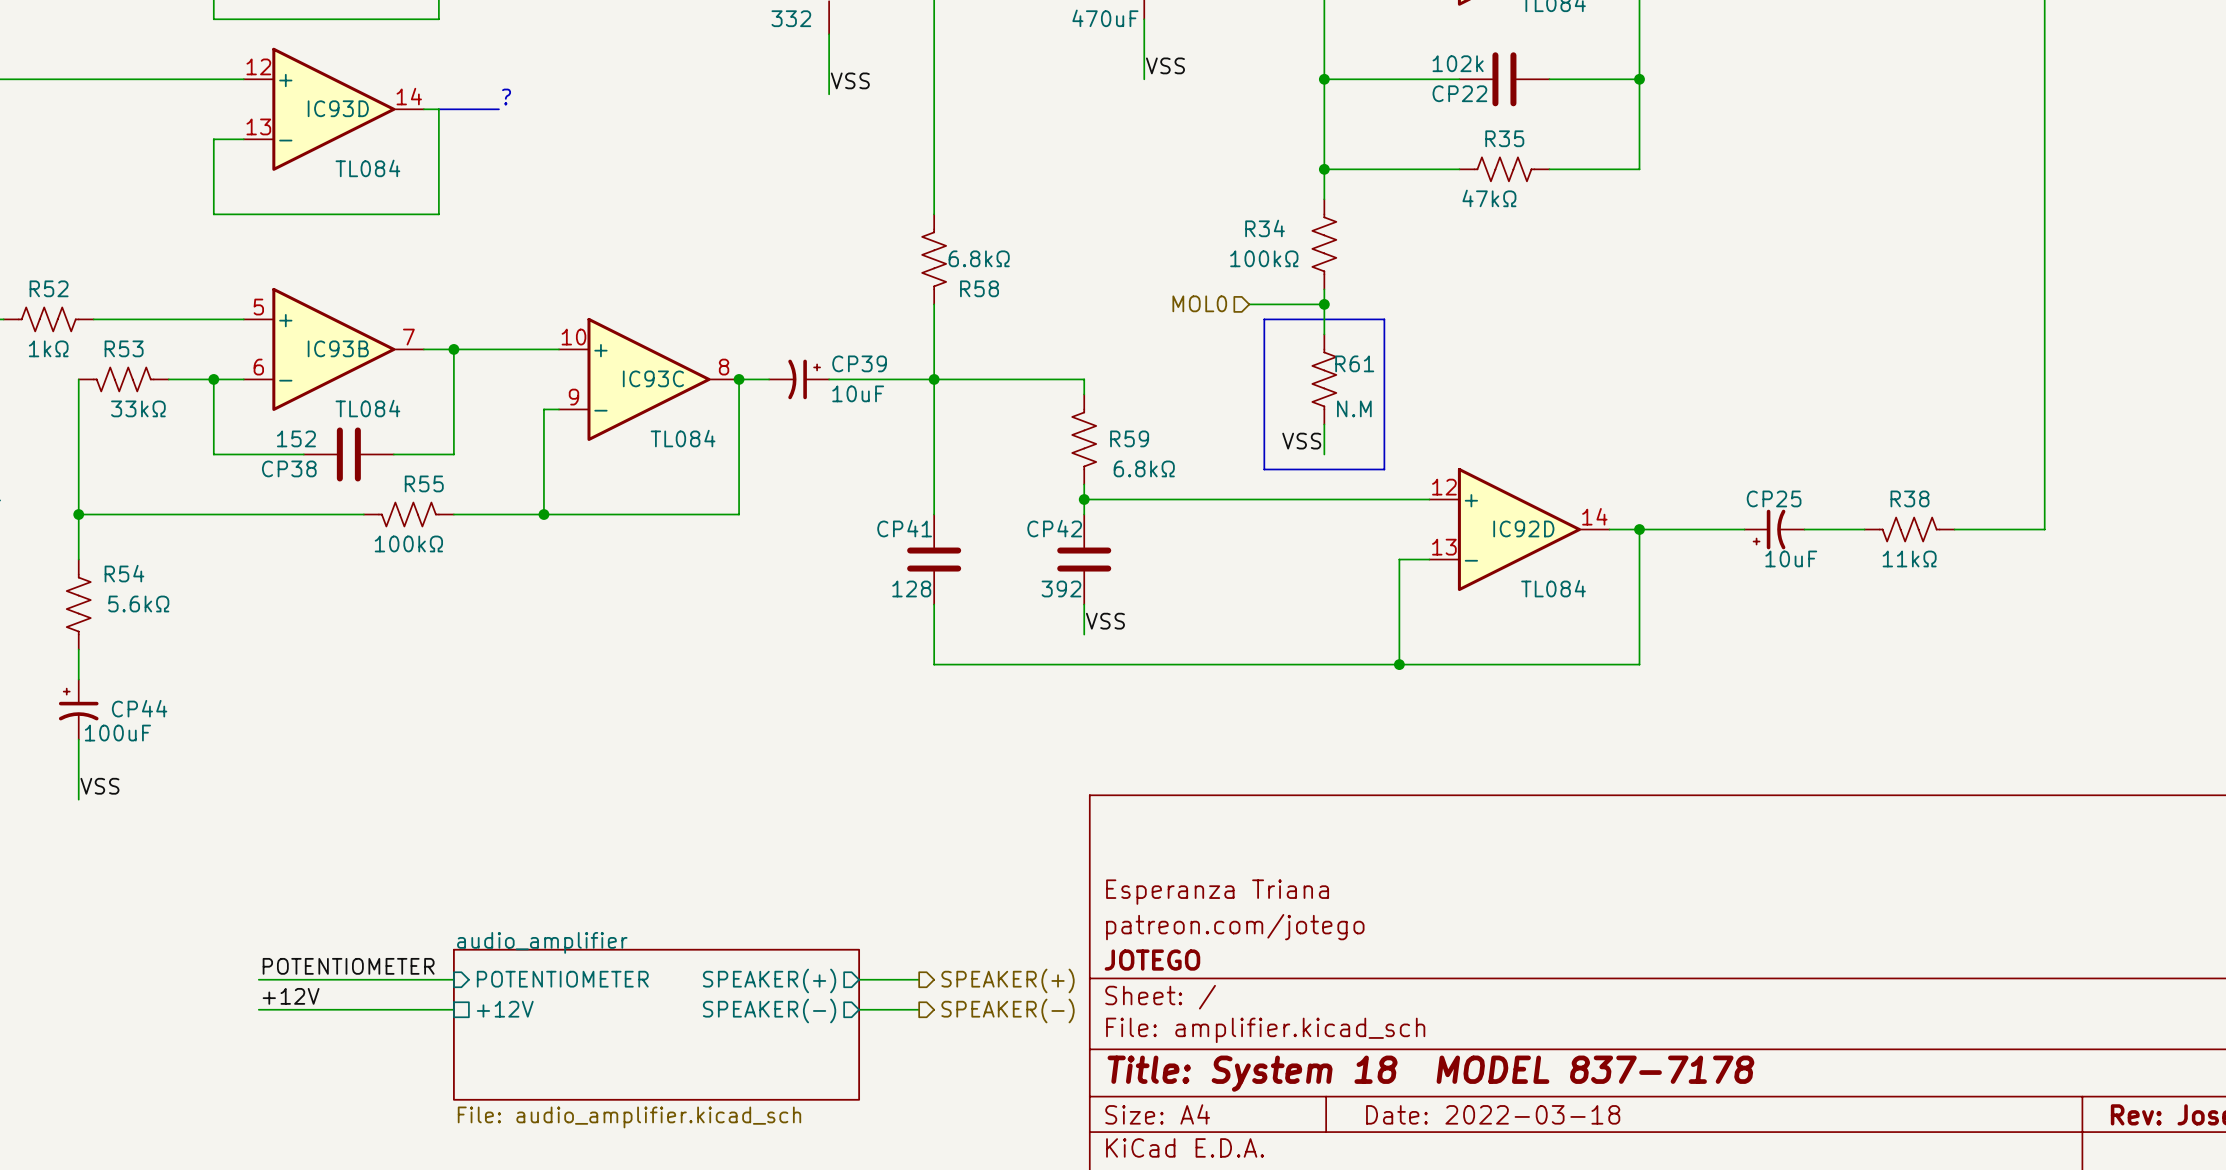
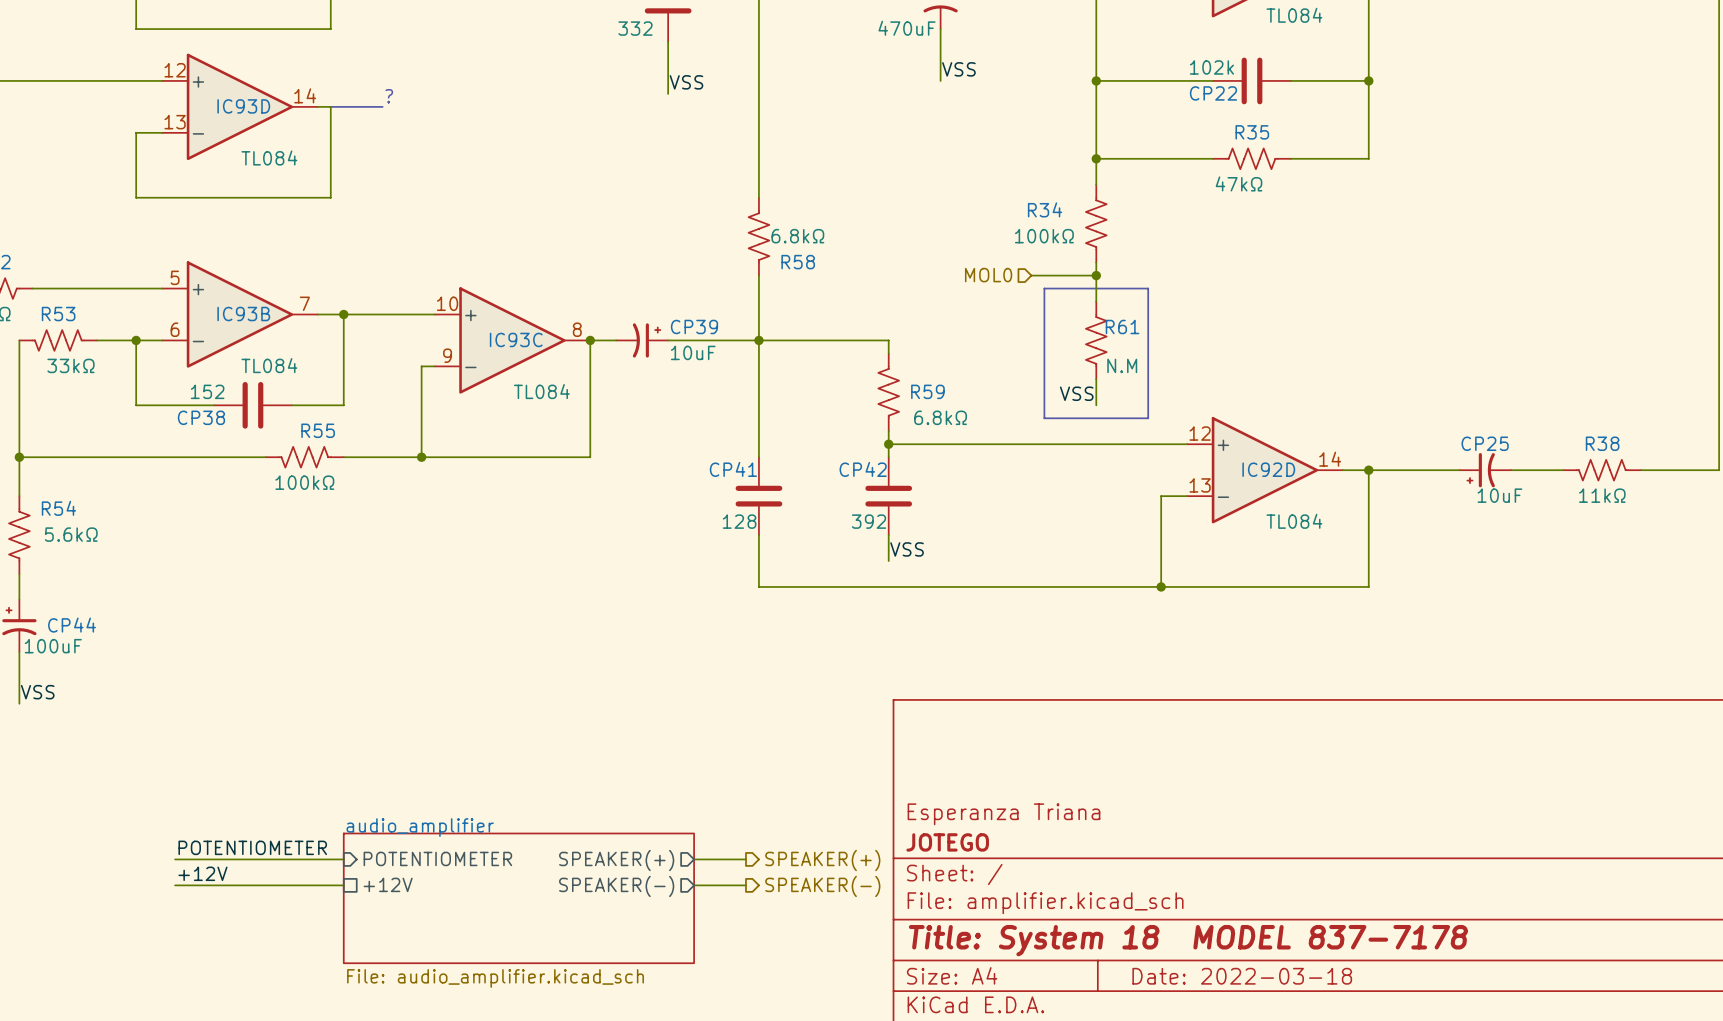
title block: Esperanza Triana (1217, 892) -> none
title block: patreon.com/jotego (1235, 927) -> Esperanza Triana (1003, 814)

